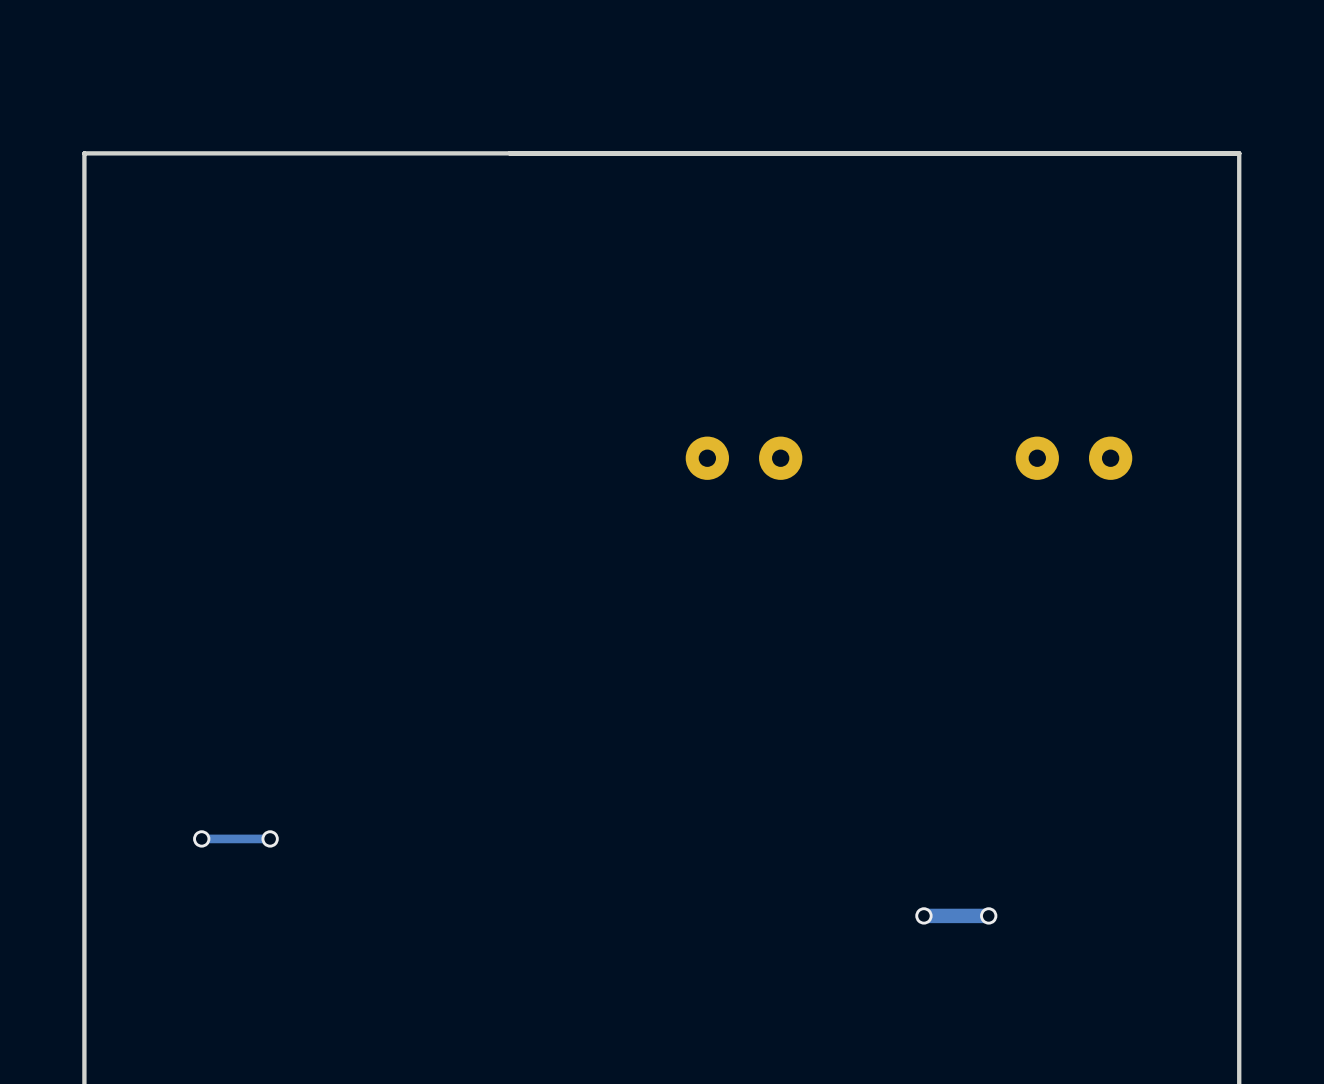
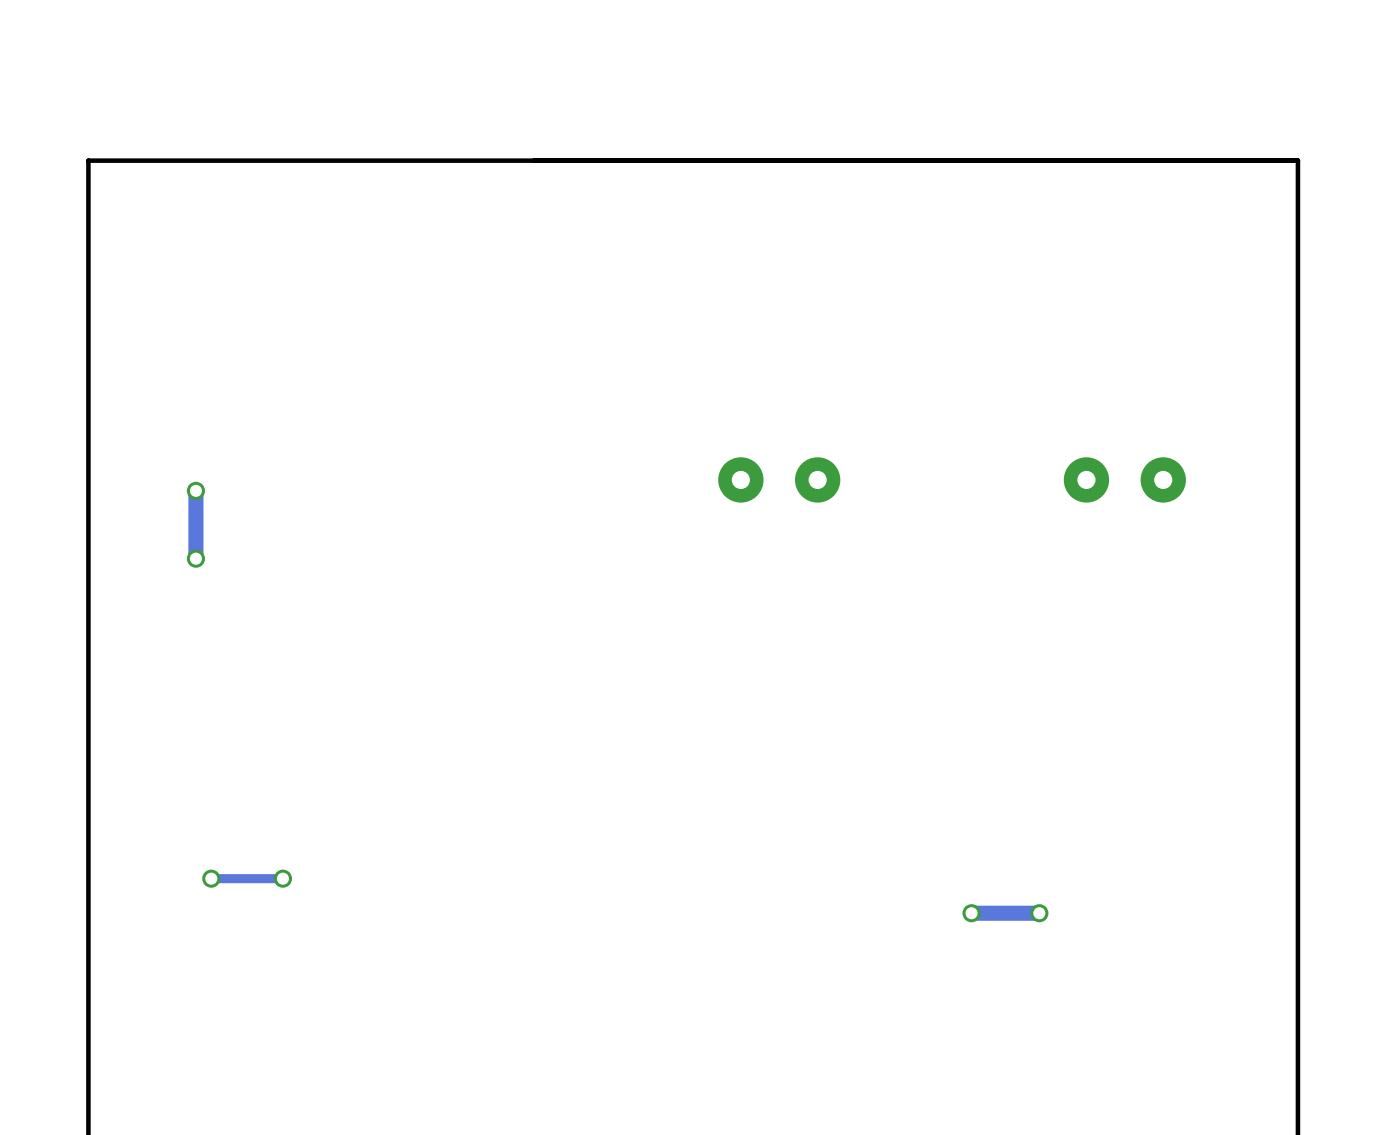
track: none -> (195, 490) (195, 558)
via: none -> (195, 490)
via: none -> (195, 558)
via: none -> (971, 913)
via: none -> (1039, 913)
via: (923, 915) -> none
track: (988, 915) (923, 915) -> (1039, 913) (971, 913)
via: (988, 915) -> none

